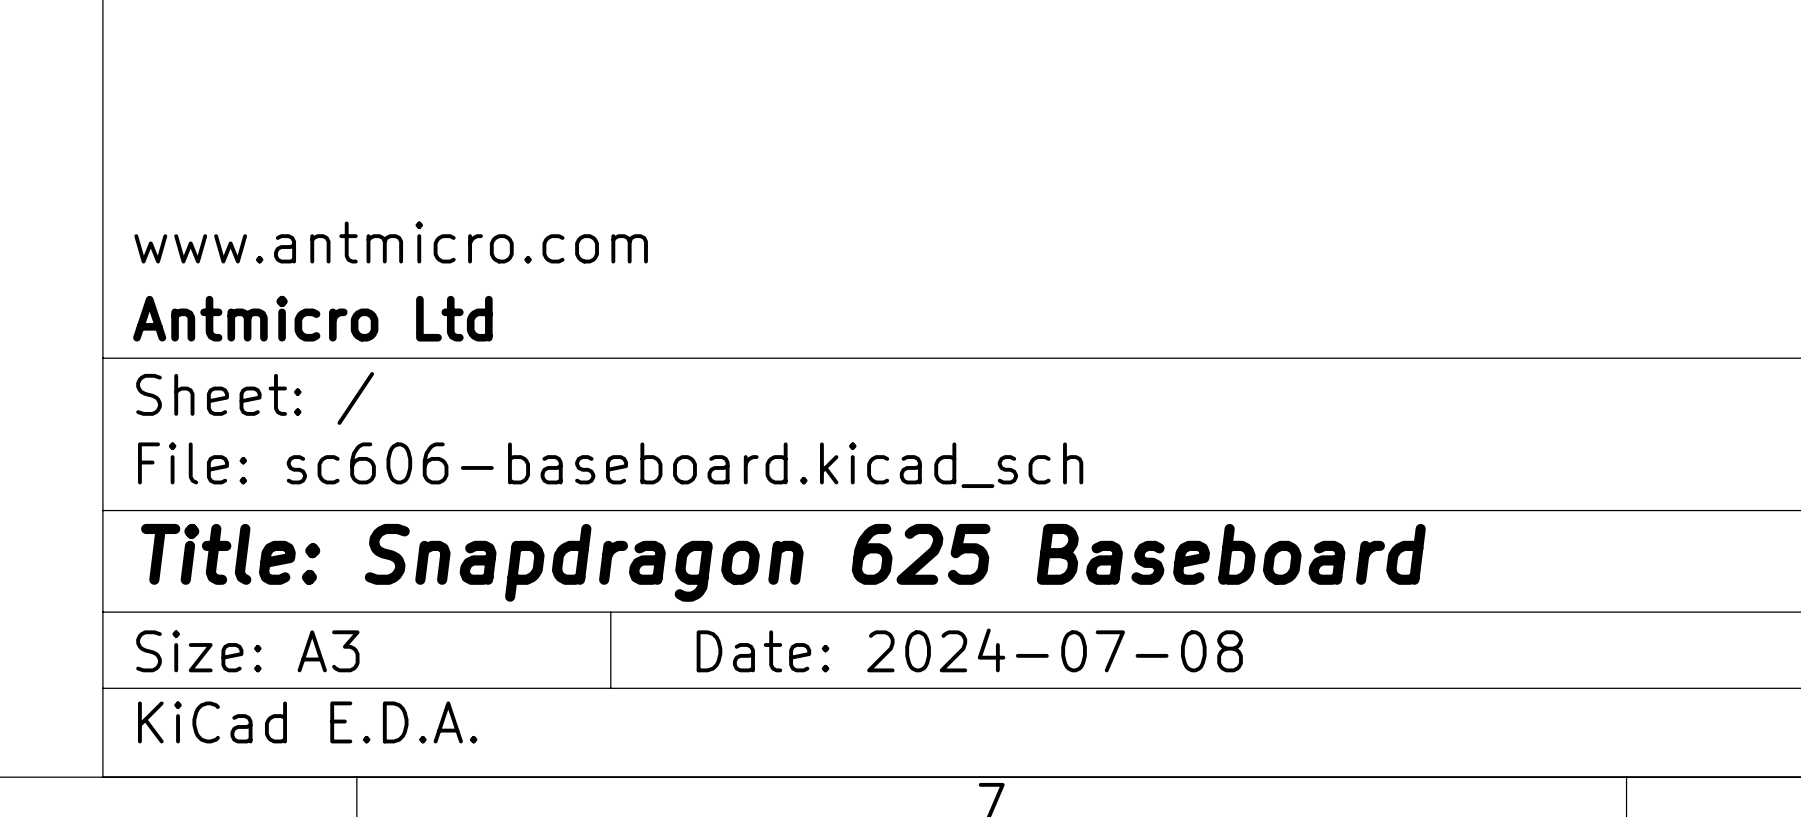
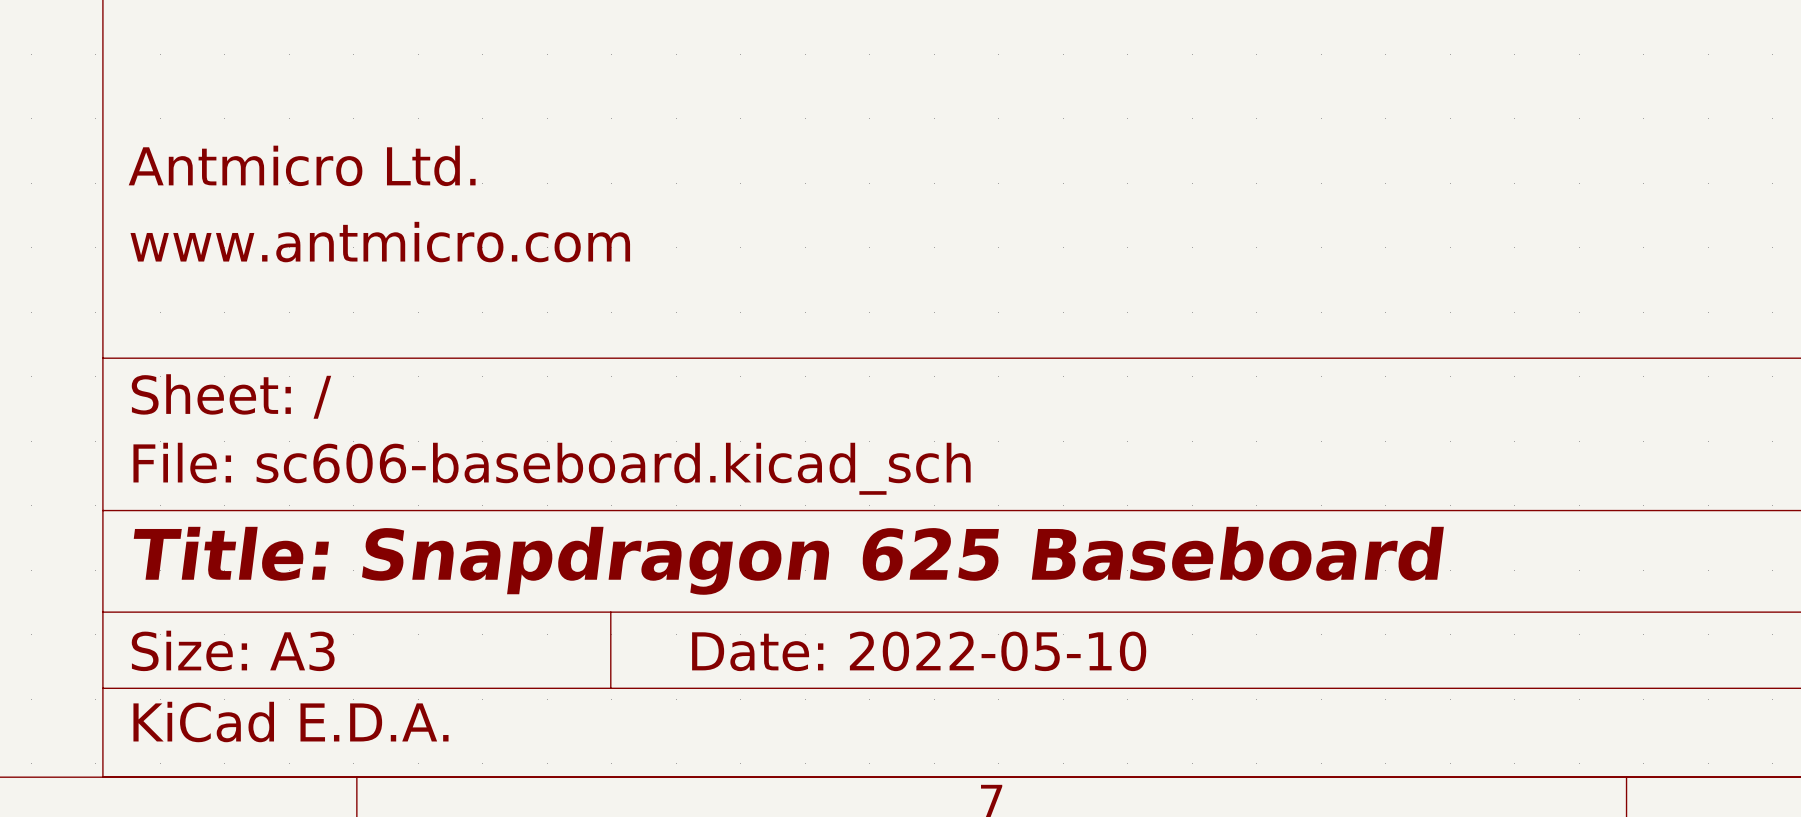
title block: none -> Antmicro Ltd. (302, 165)
title block: Antmicro Ltd (312, 318) -> none
title block: Date: 2024-07-08 (969, 650) -> Date: 2022-05-10 (919, 651)

